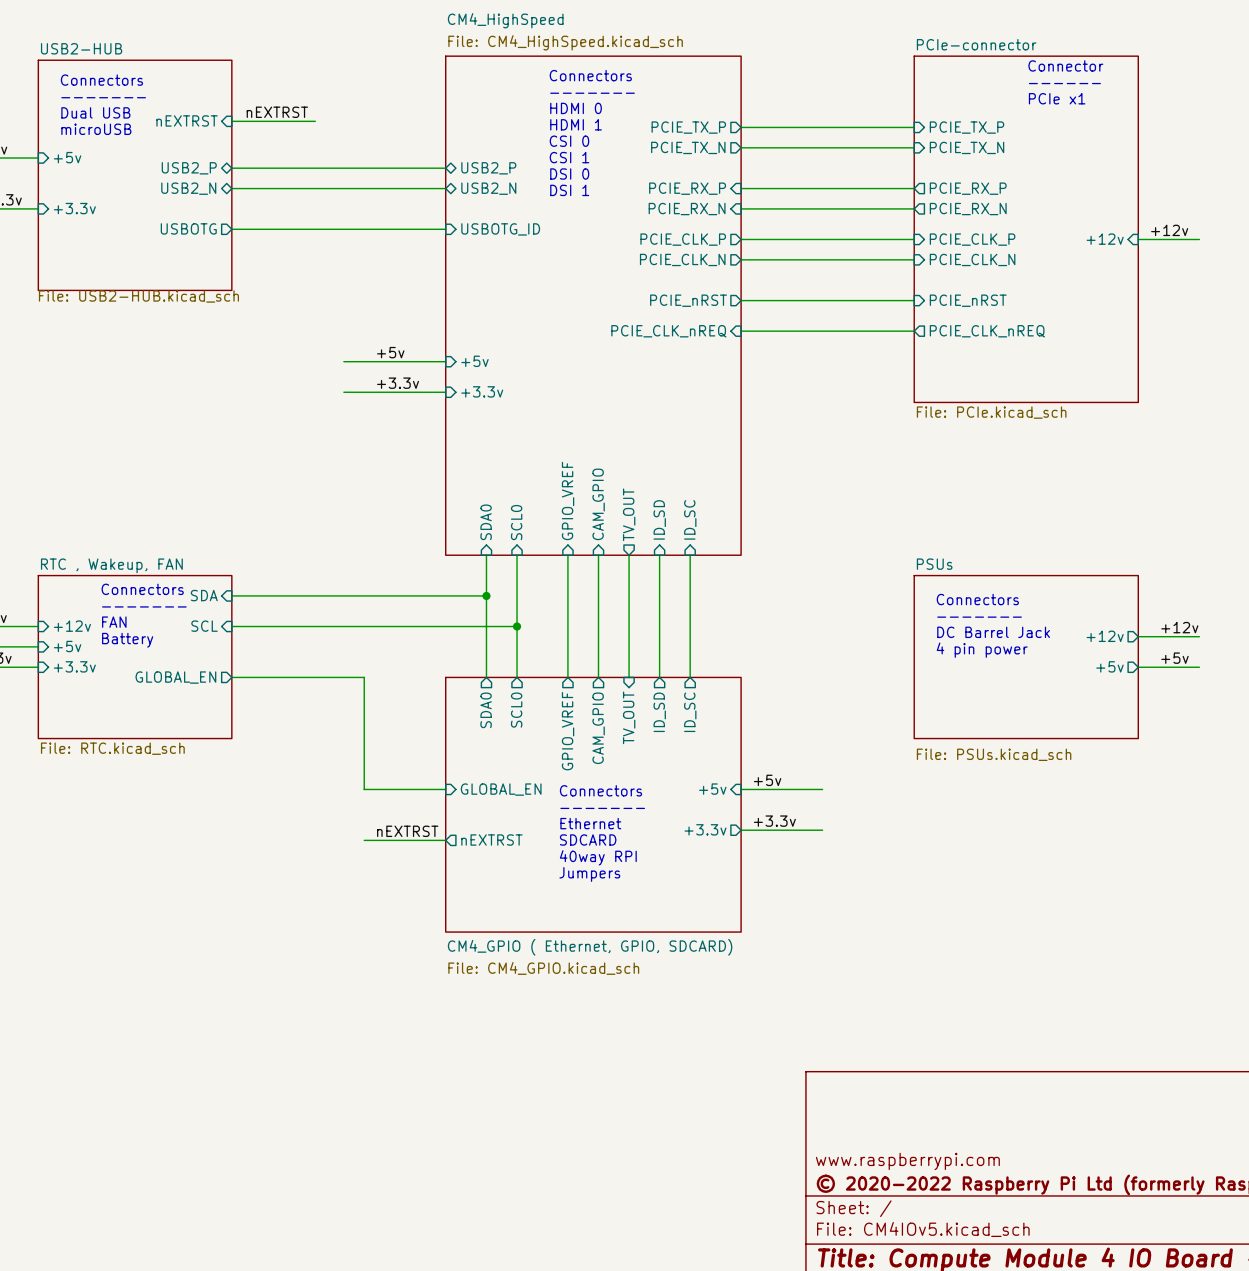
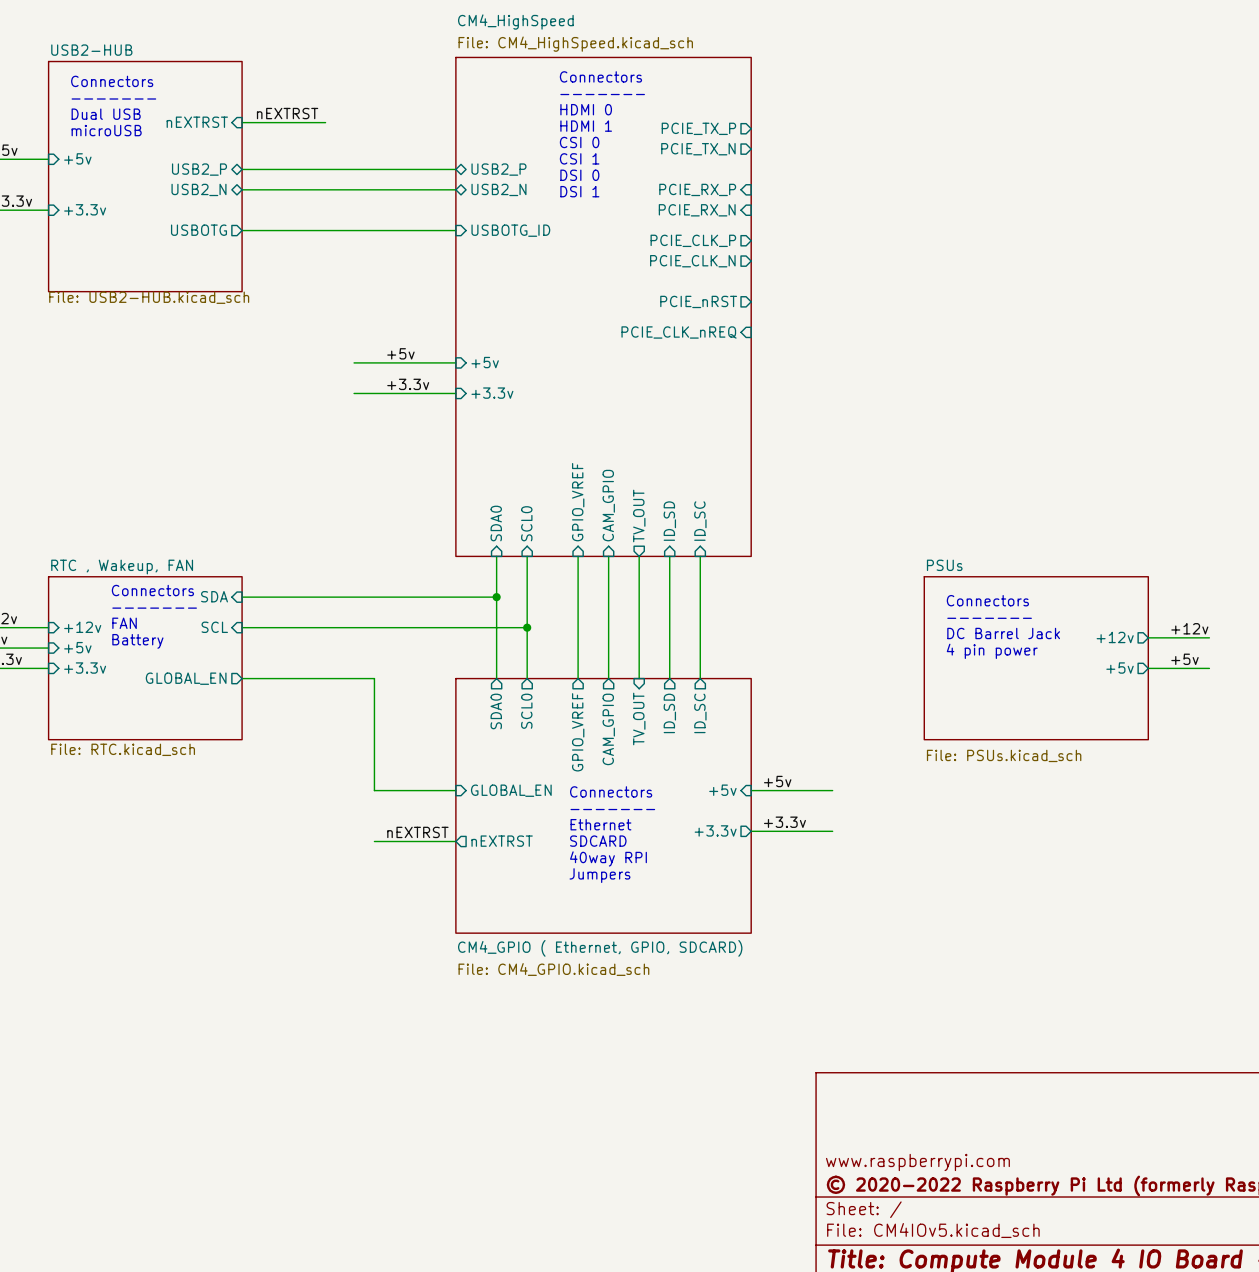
text: Connector (1065, 65) -> none
text: ------ (1064, 83) -> none
text: PCIe x1 (1057, 98) -> none
wire: (741, 127) (914, 127) -> none
sheet pin: PCIE_TX_P (967, 127) -> none
wire: (741, 147) (914, 147) -> none
sheet pin: PCIE_TX_N (967, 147) -> none
wire: (741, 188) (914, 188) -> none
sheet pin: PCIE_RX_P (968, 188) -> none
wire: (741, 208) (914, 208) -> none
sheet pin: PCIE_RX_N (968, 209) -> none
sheet PCIe-connector: File: PCIe.kicad_sch (1026, 229) -> none
label: +12v (1169, 230) -> none
wire: (741, 239) (914, 239) -> none
sheet pin: PCIE_CLK_P (972, 239) -> none
sheet pin: +12v (1105, 239) -> none
wire: (1138, 239) (1199, 239) -> none
wire: (741, 259) (914, 259) -> none
sheet pin: PCIE_CLK_N (972, 259) -> none
wire: (741, 300) (914, 300) -> none
sheet pin: PCIE_nRST (968, 300) -> none
wire: (741, 331) (914, 331) -> none
sheet pin: PCIE_CLK_nREQ (987, 331) -> none

